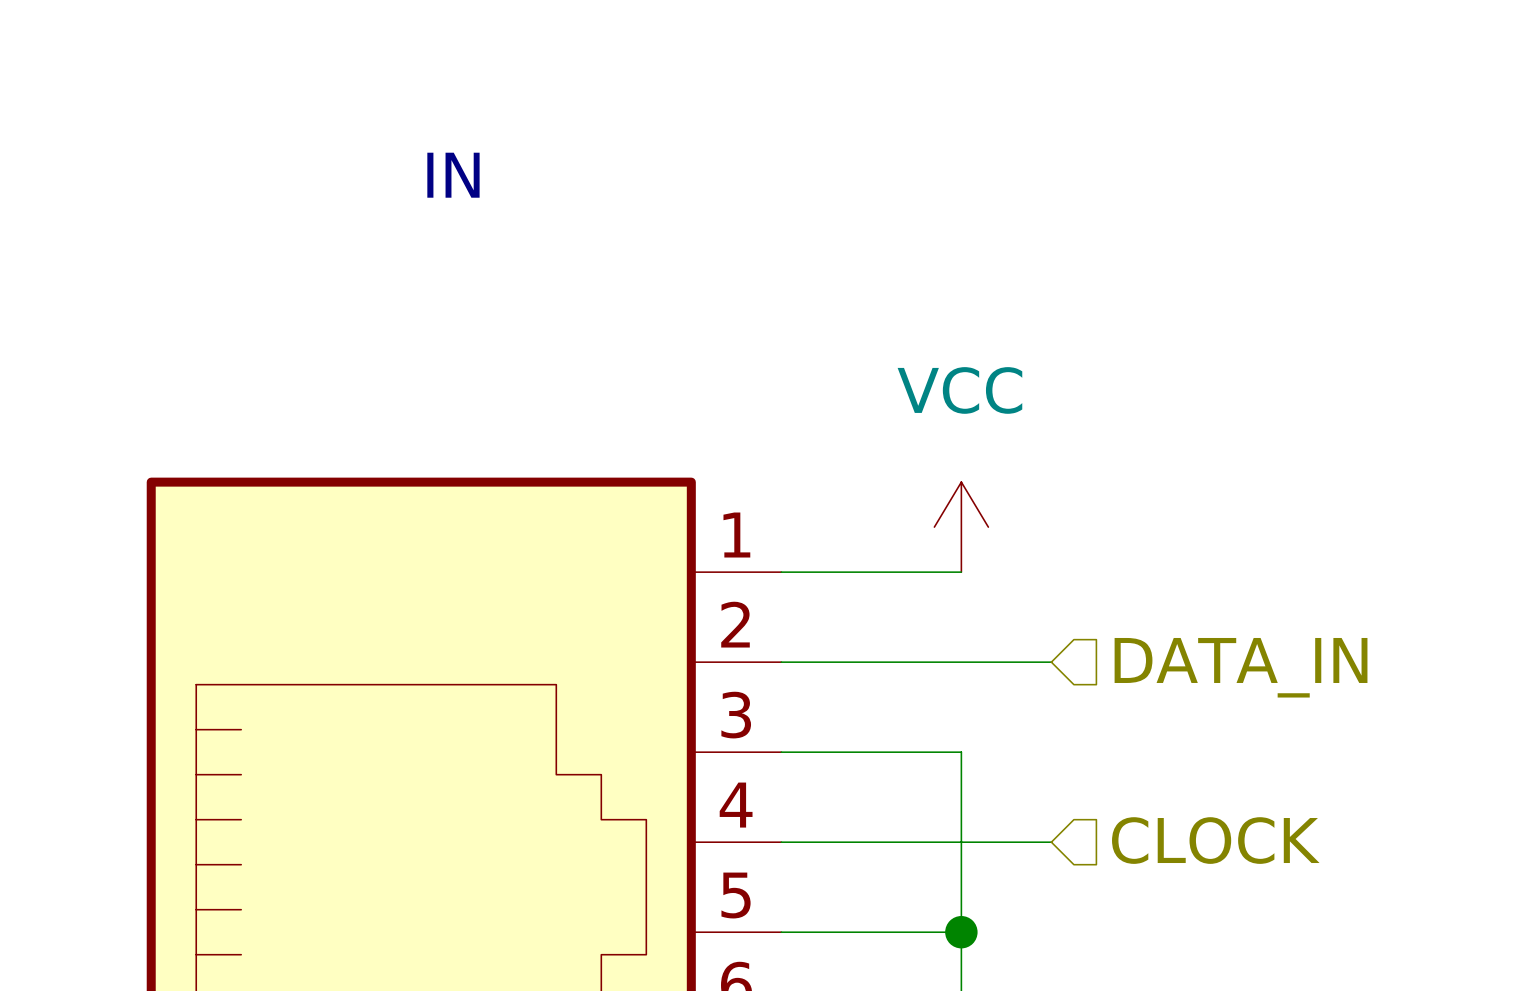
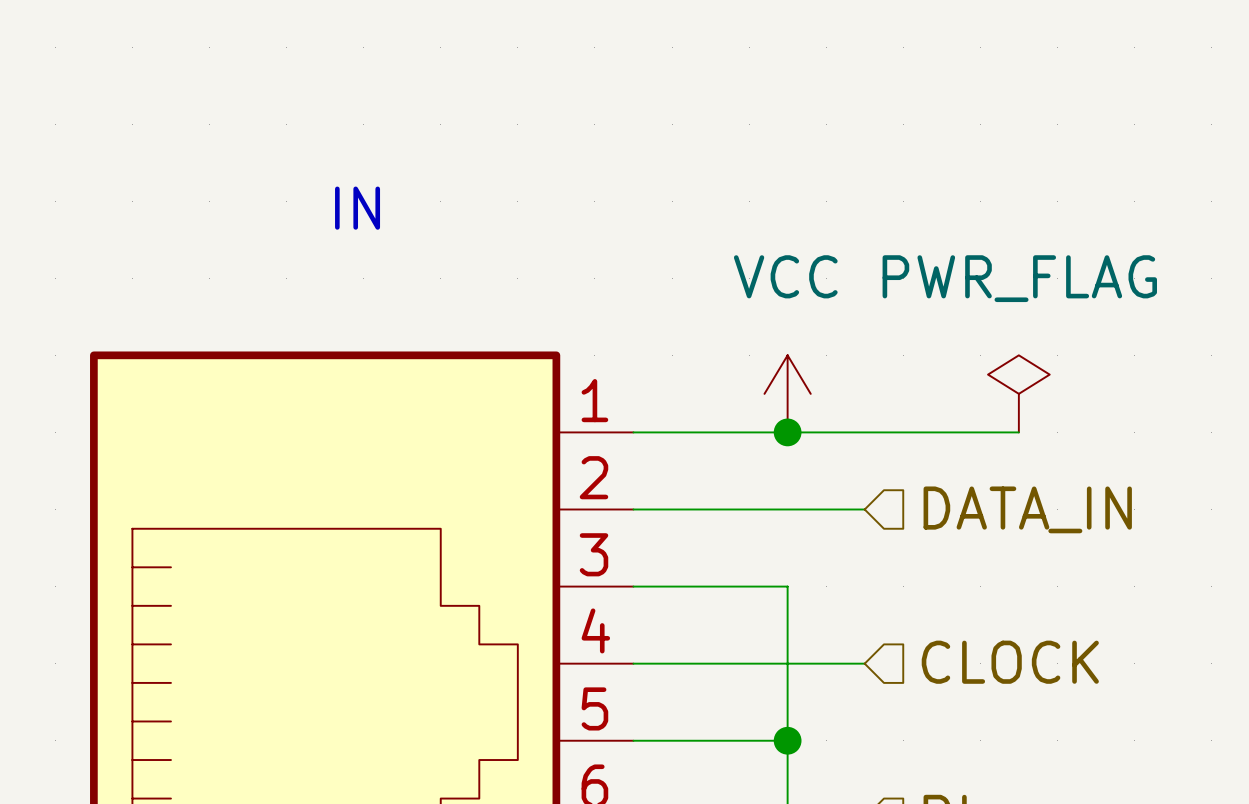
text position: IN (453, 175) -> IN (357, 208)
power symbol: none -> PWR_FLAG (1018, 393)
wire: none -> (787, 432) (1018, 432)
junction: none -> (787, 432)

